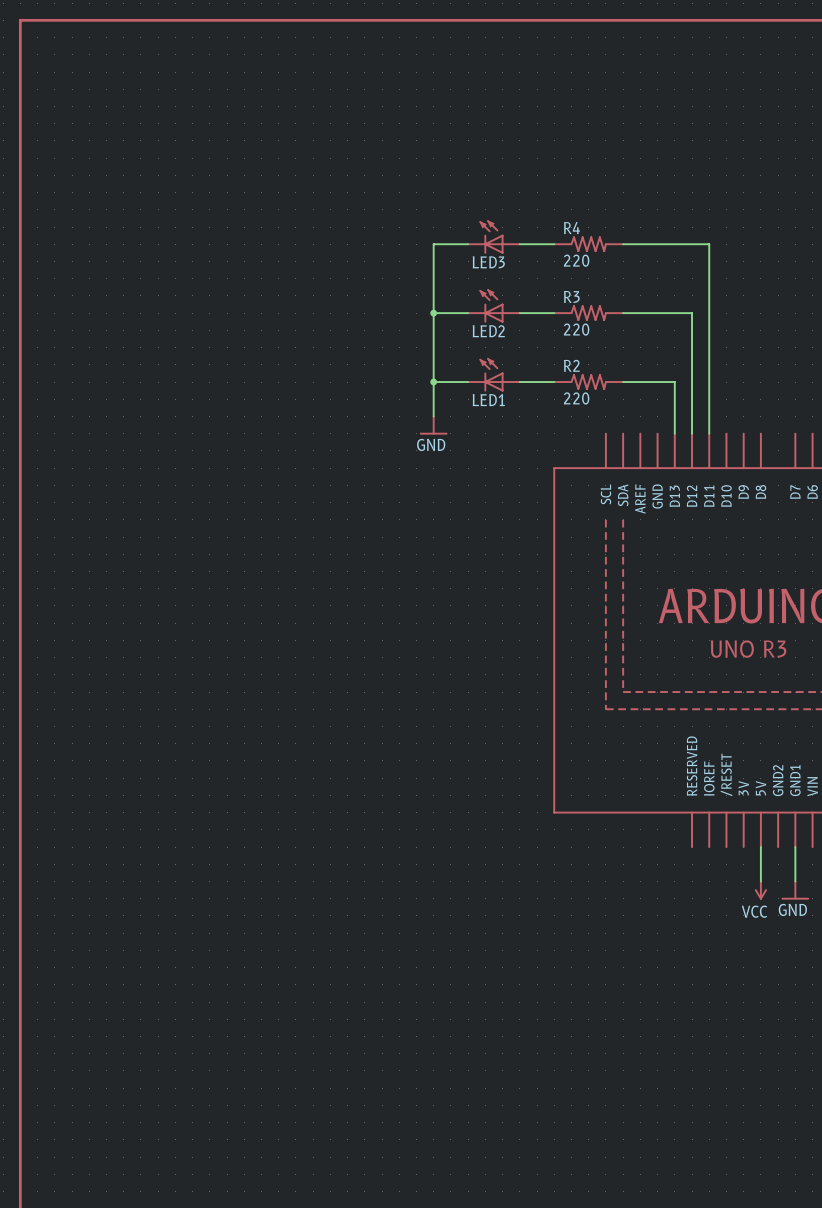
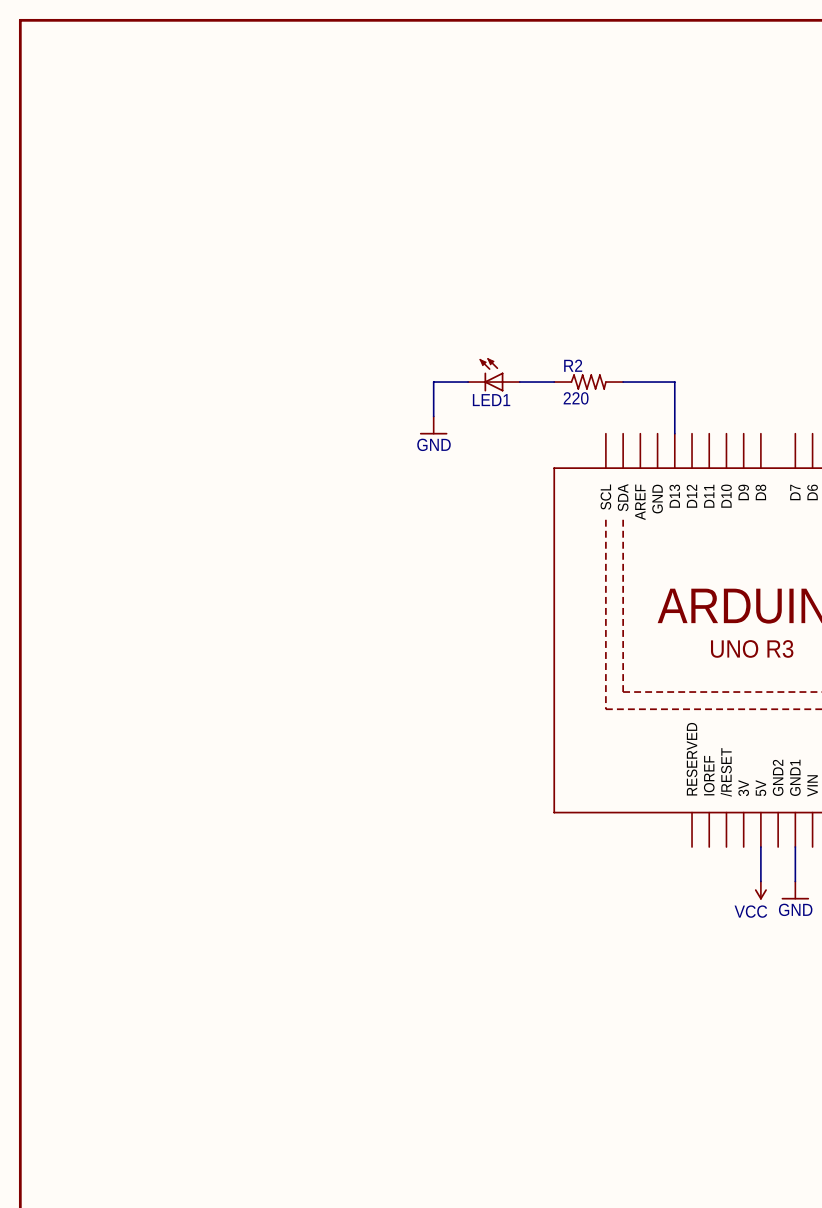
LED3: (493, 237) -> none
wire: (468, 244) (433, 244) (433, 382) -> none
wire: (519, 244) (554, 244) -> none
R4: 220 (588, 244) -> none
wire: (623, 244) (709, 244) (709, 433) -> none
LED2: (493, 305) -> none
wire: (433, 313) (468, 313) -> none
junction: (433, 313) -> none
wire: (519, 313) (554, 313) -> none
R3: 220 (588, 313) -> none
wire: (623, 313) (692, 313) (692, 433) -> none
junction: (433, 382) -> none

